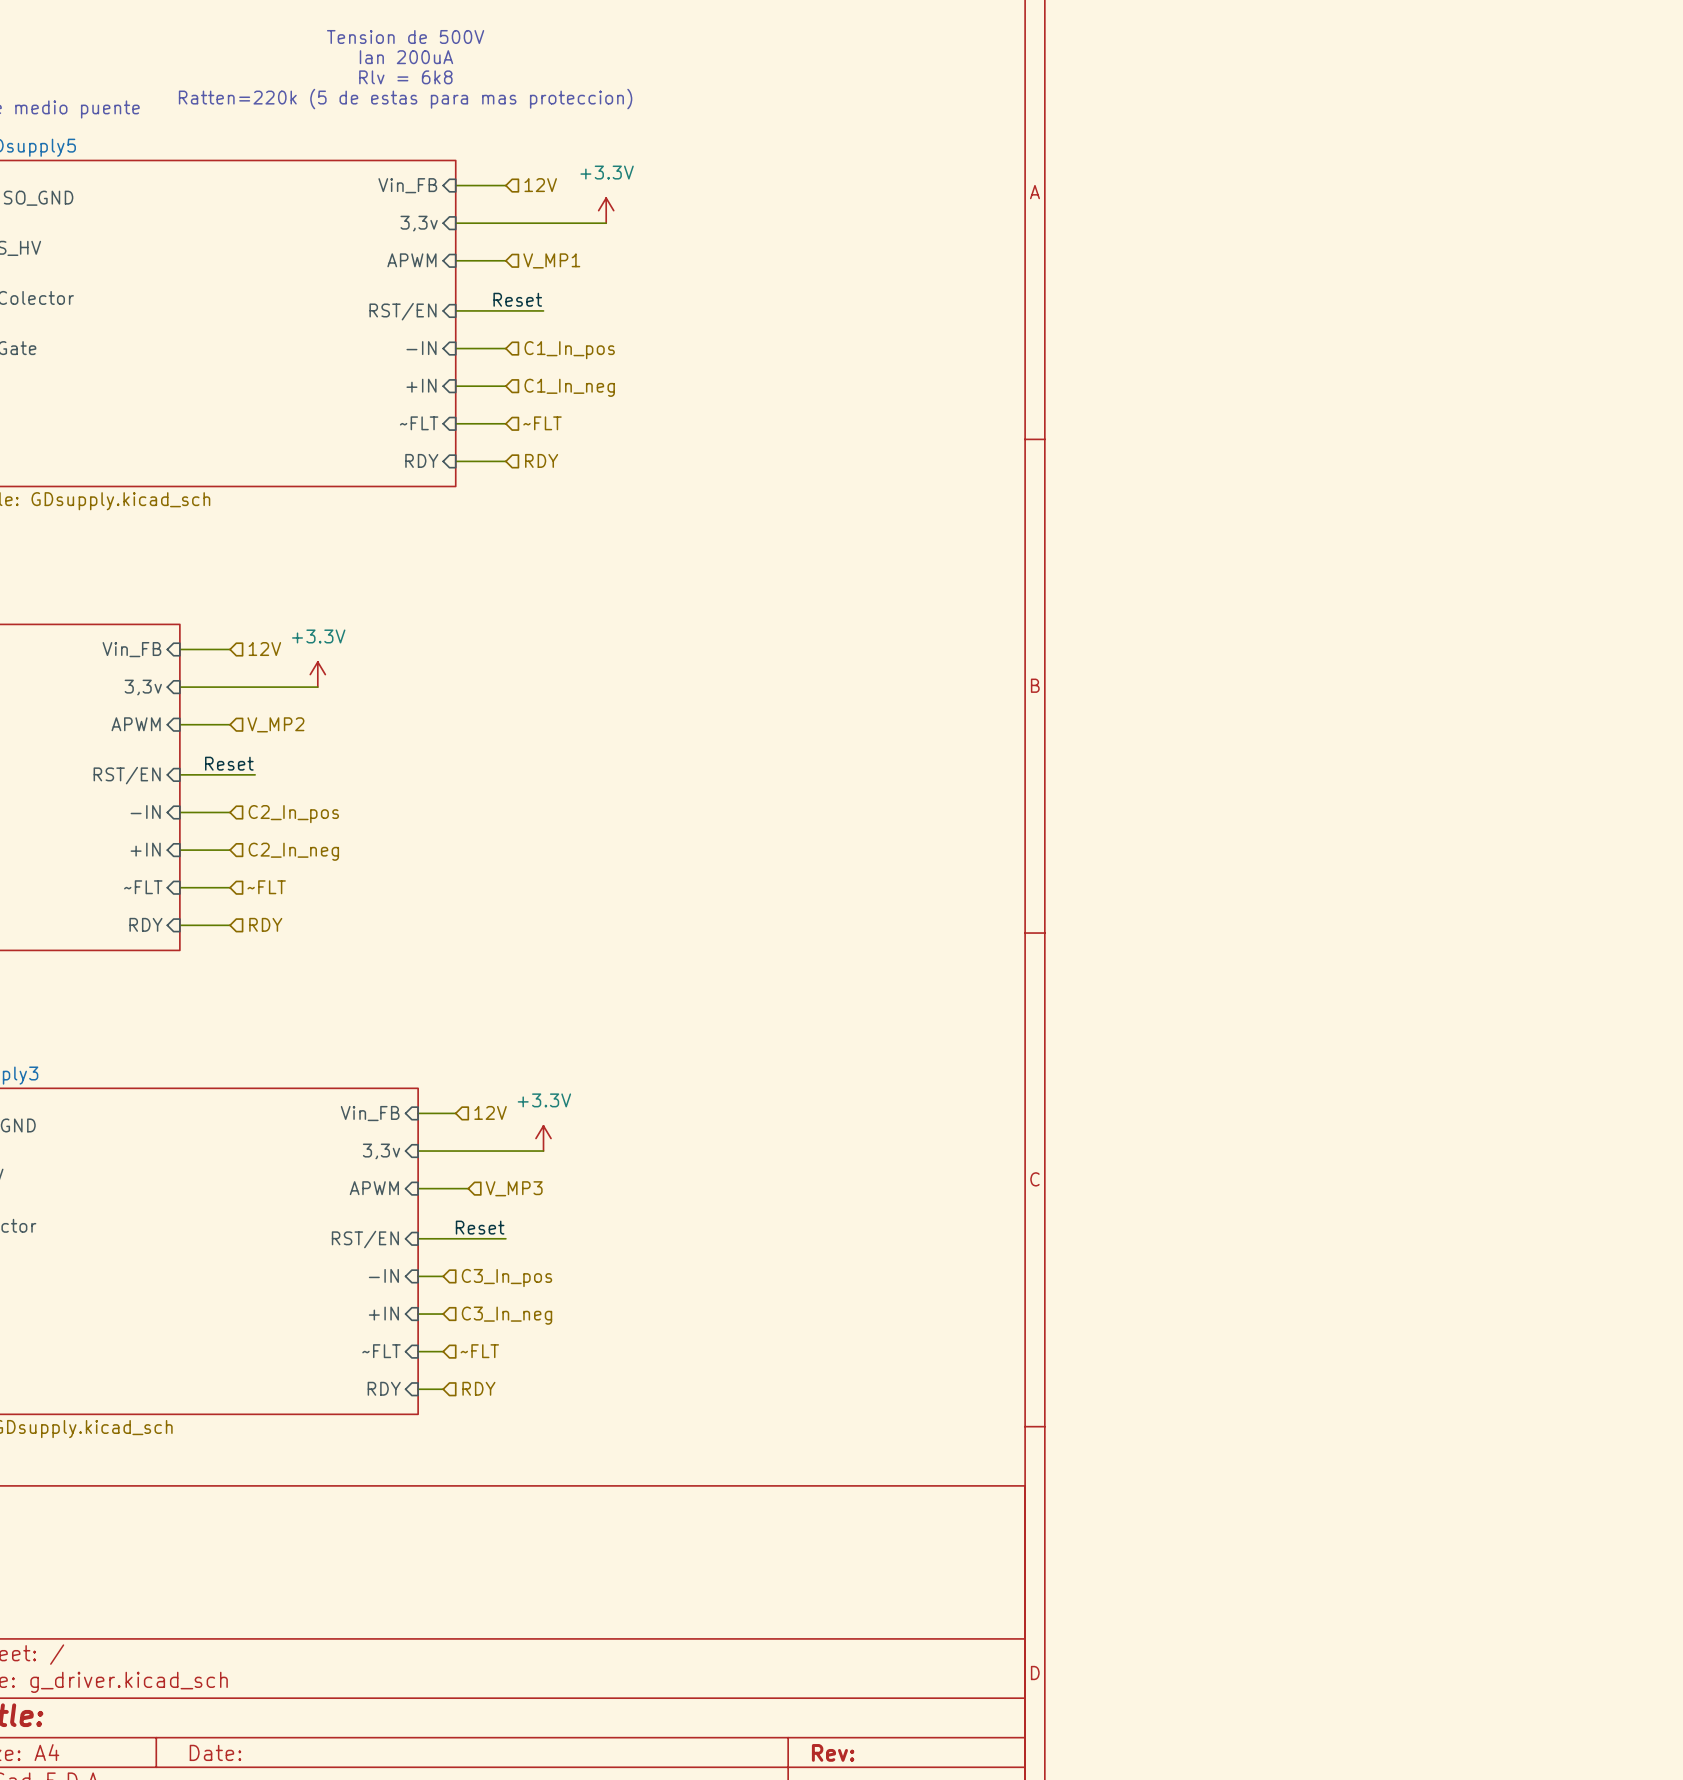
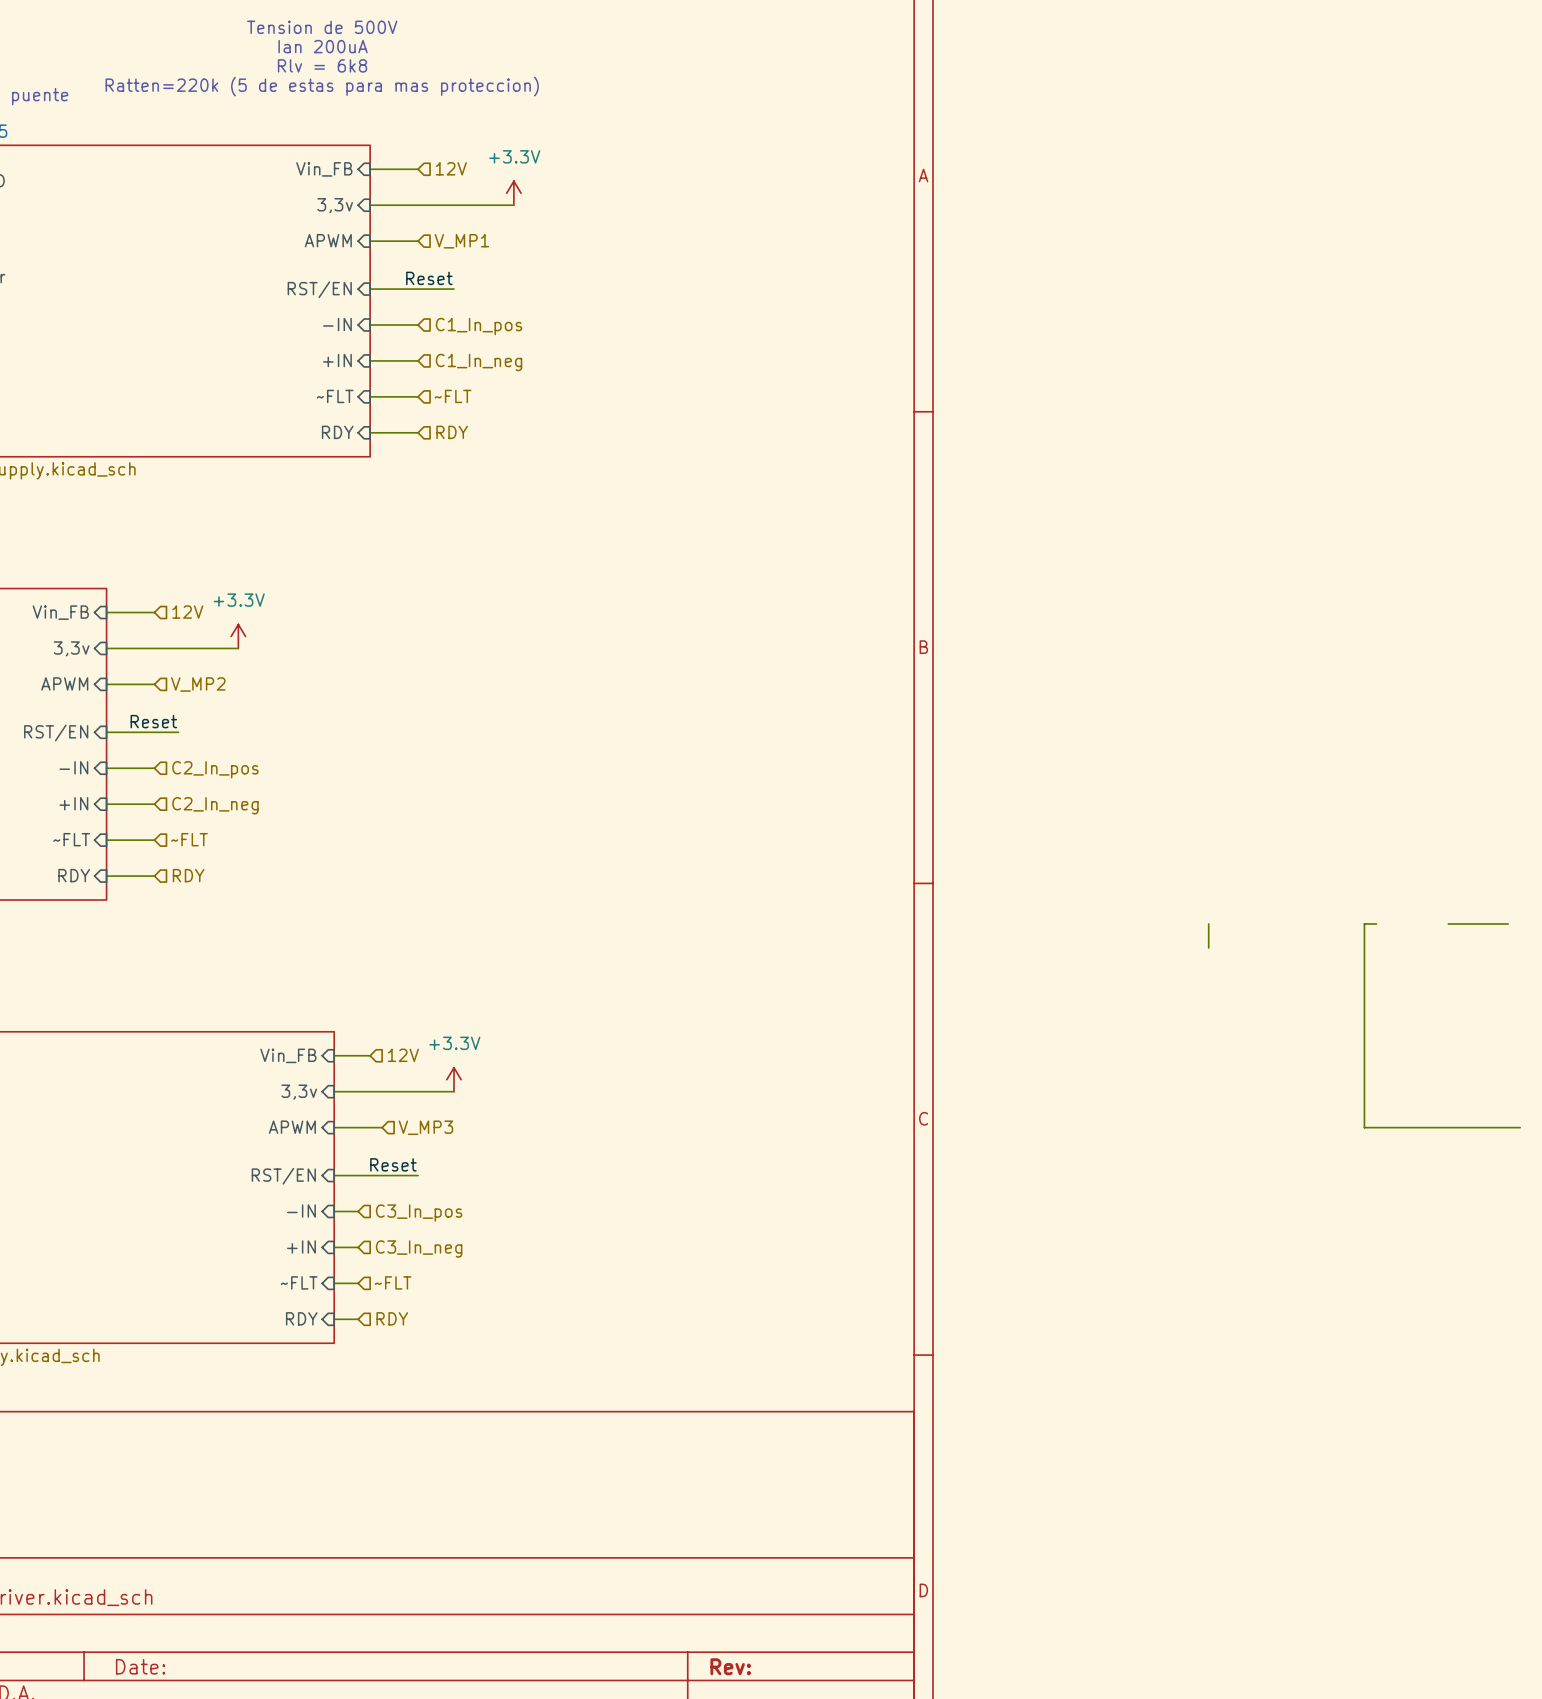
wire: none -> (1208, 923) (1208, 947)
wire: none -> (1376, 923) (1364, 923) (1364, 1127) (1520, 1127)
wire: none -> (1448, 923) (1508, 923)

